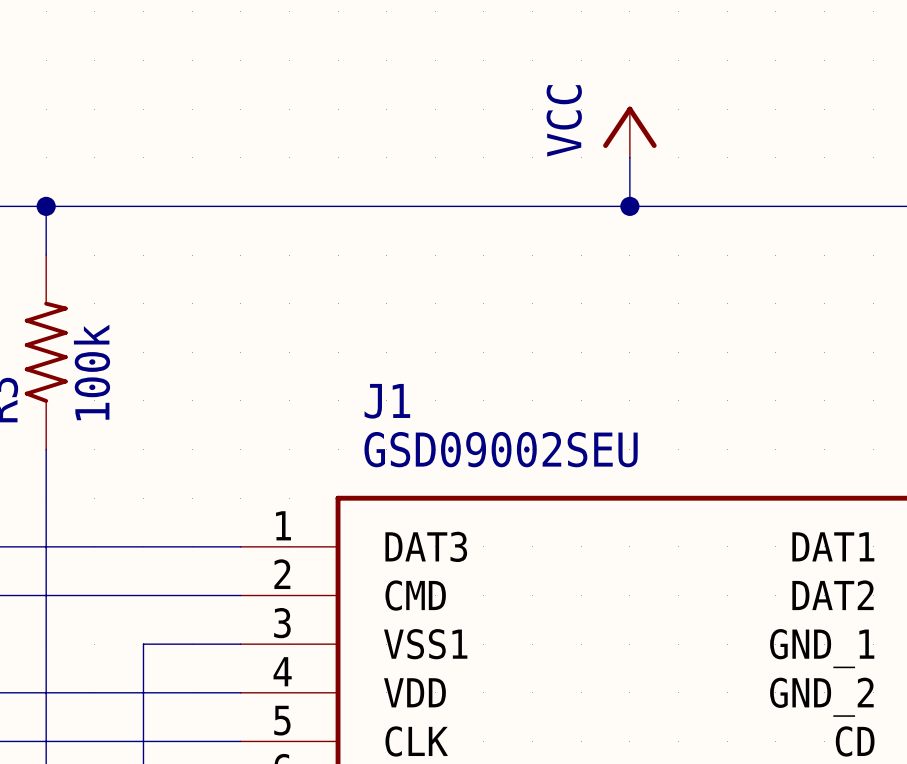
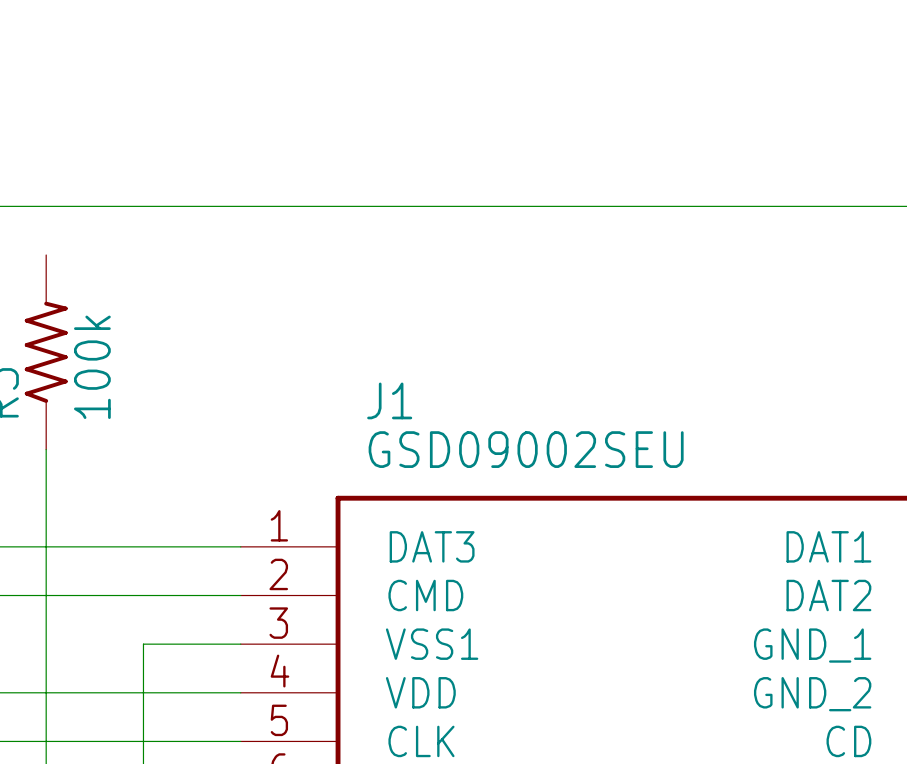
power symbol: VCC (629, 132) -> none
wire: (629, 157) (629, 206) -> none
wire: (46, 206) (46, 255) -> none
junction: (46, 206) -> none
junction: (629, 206) -> none

